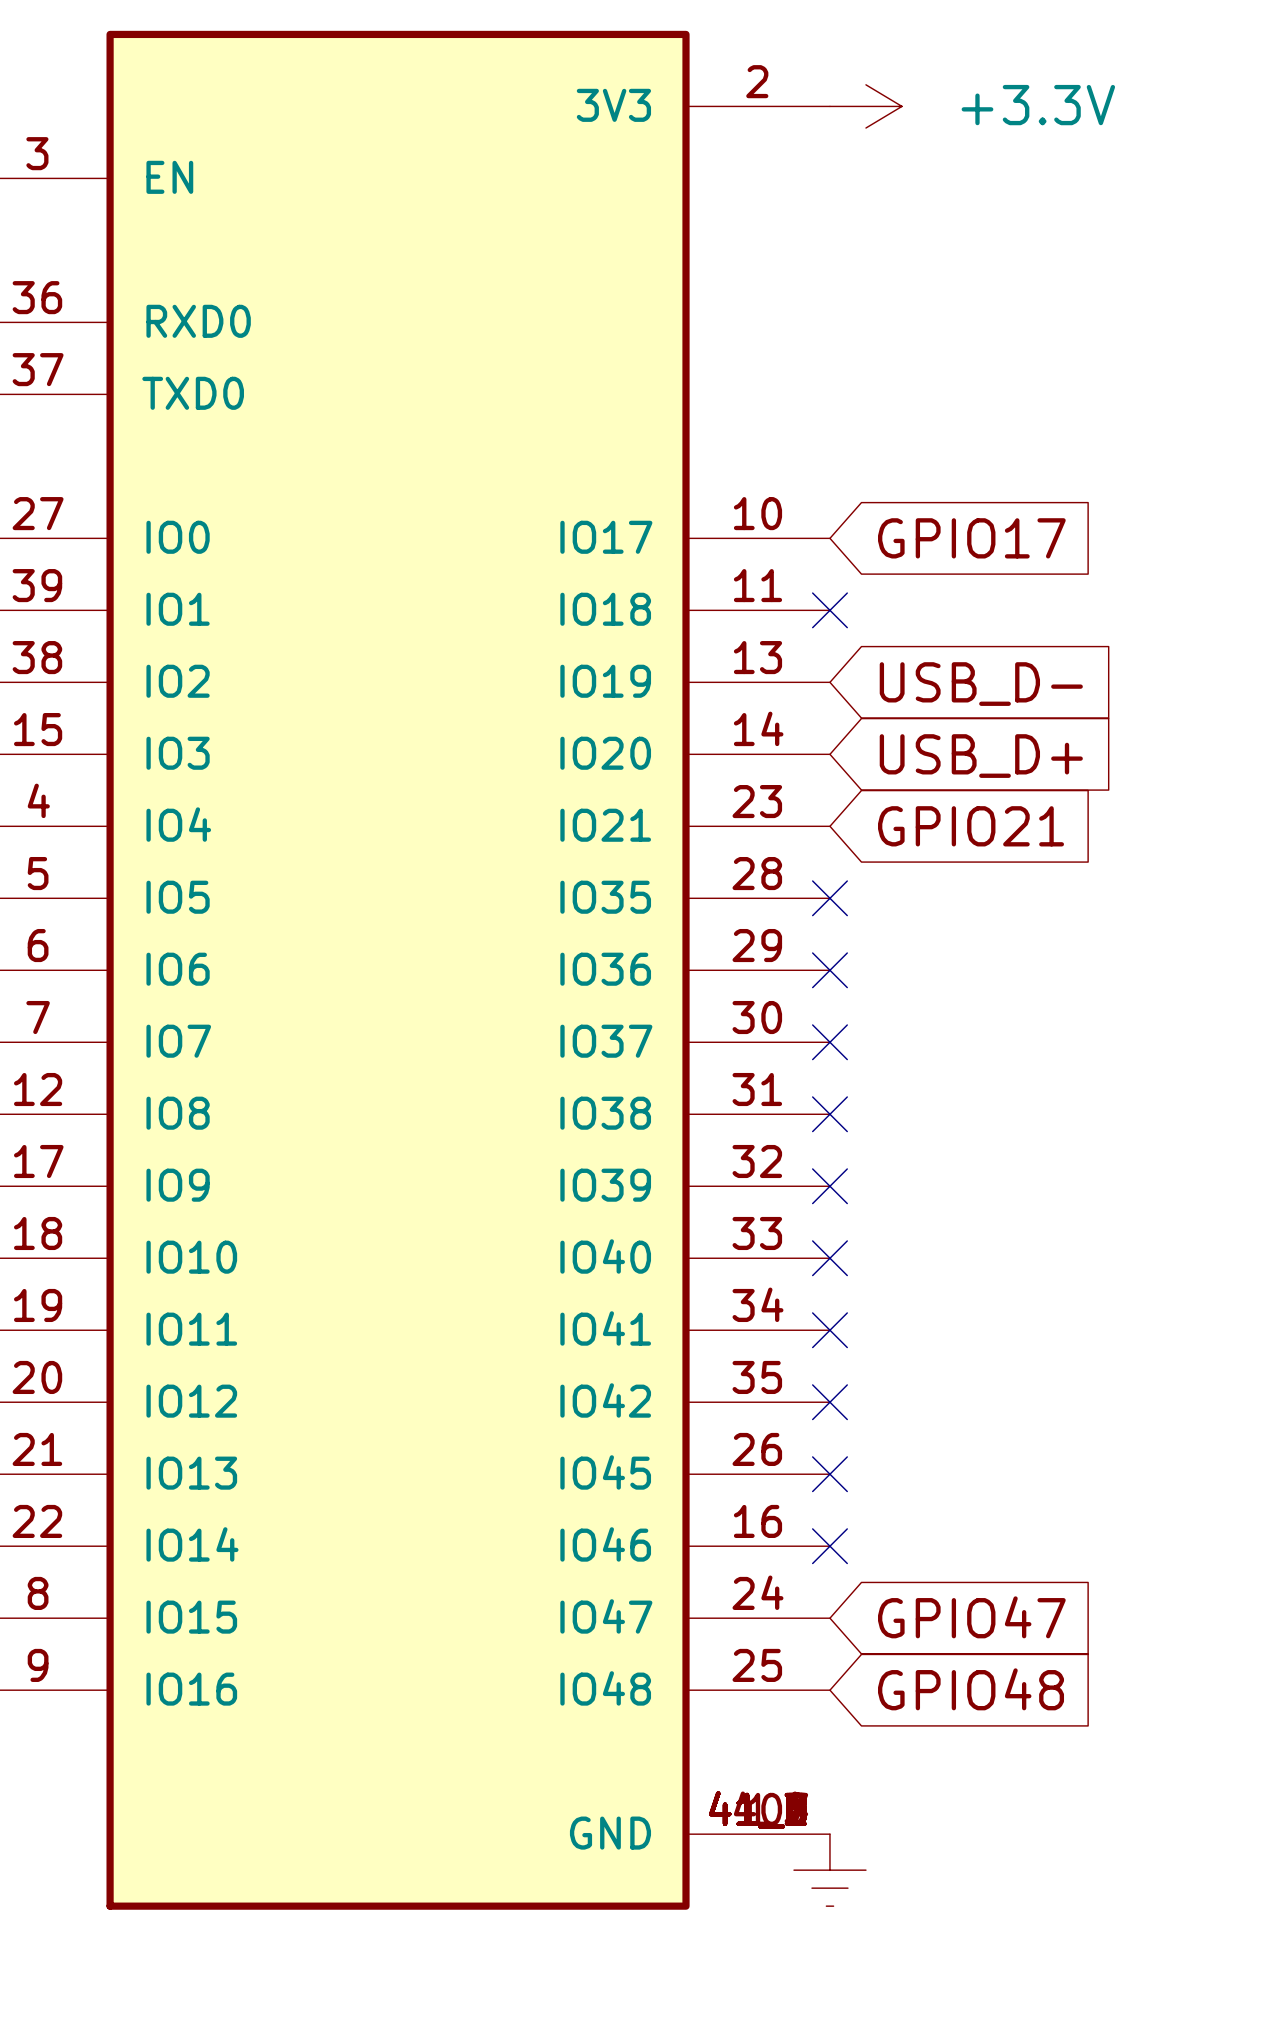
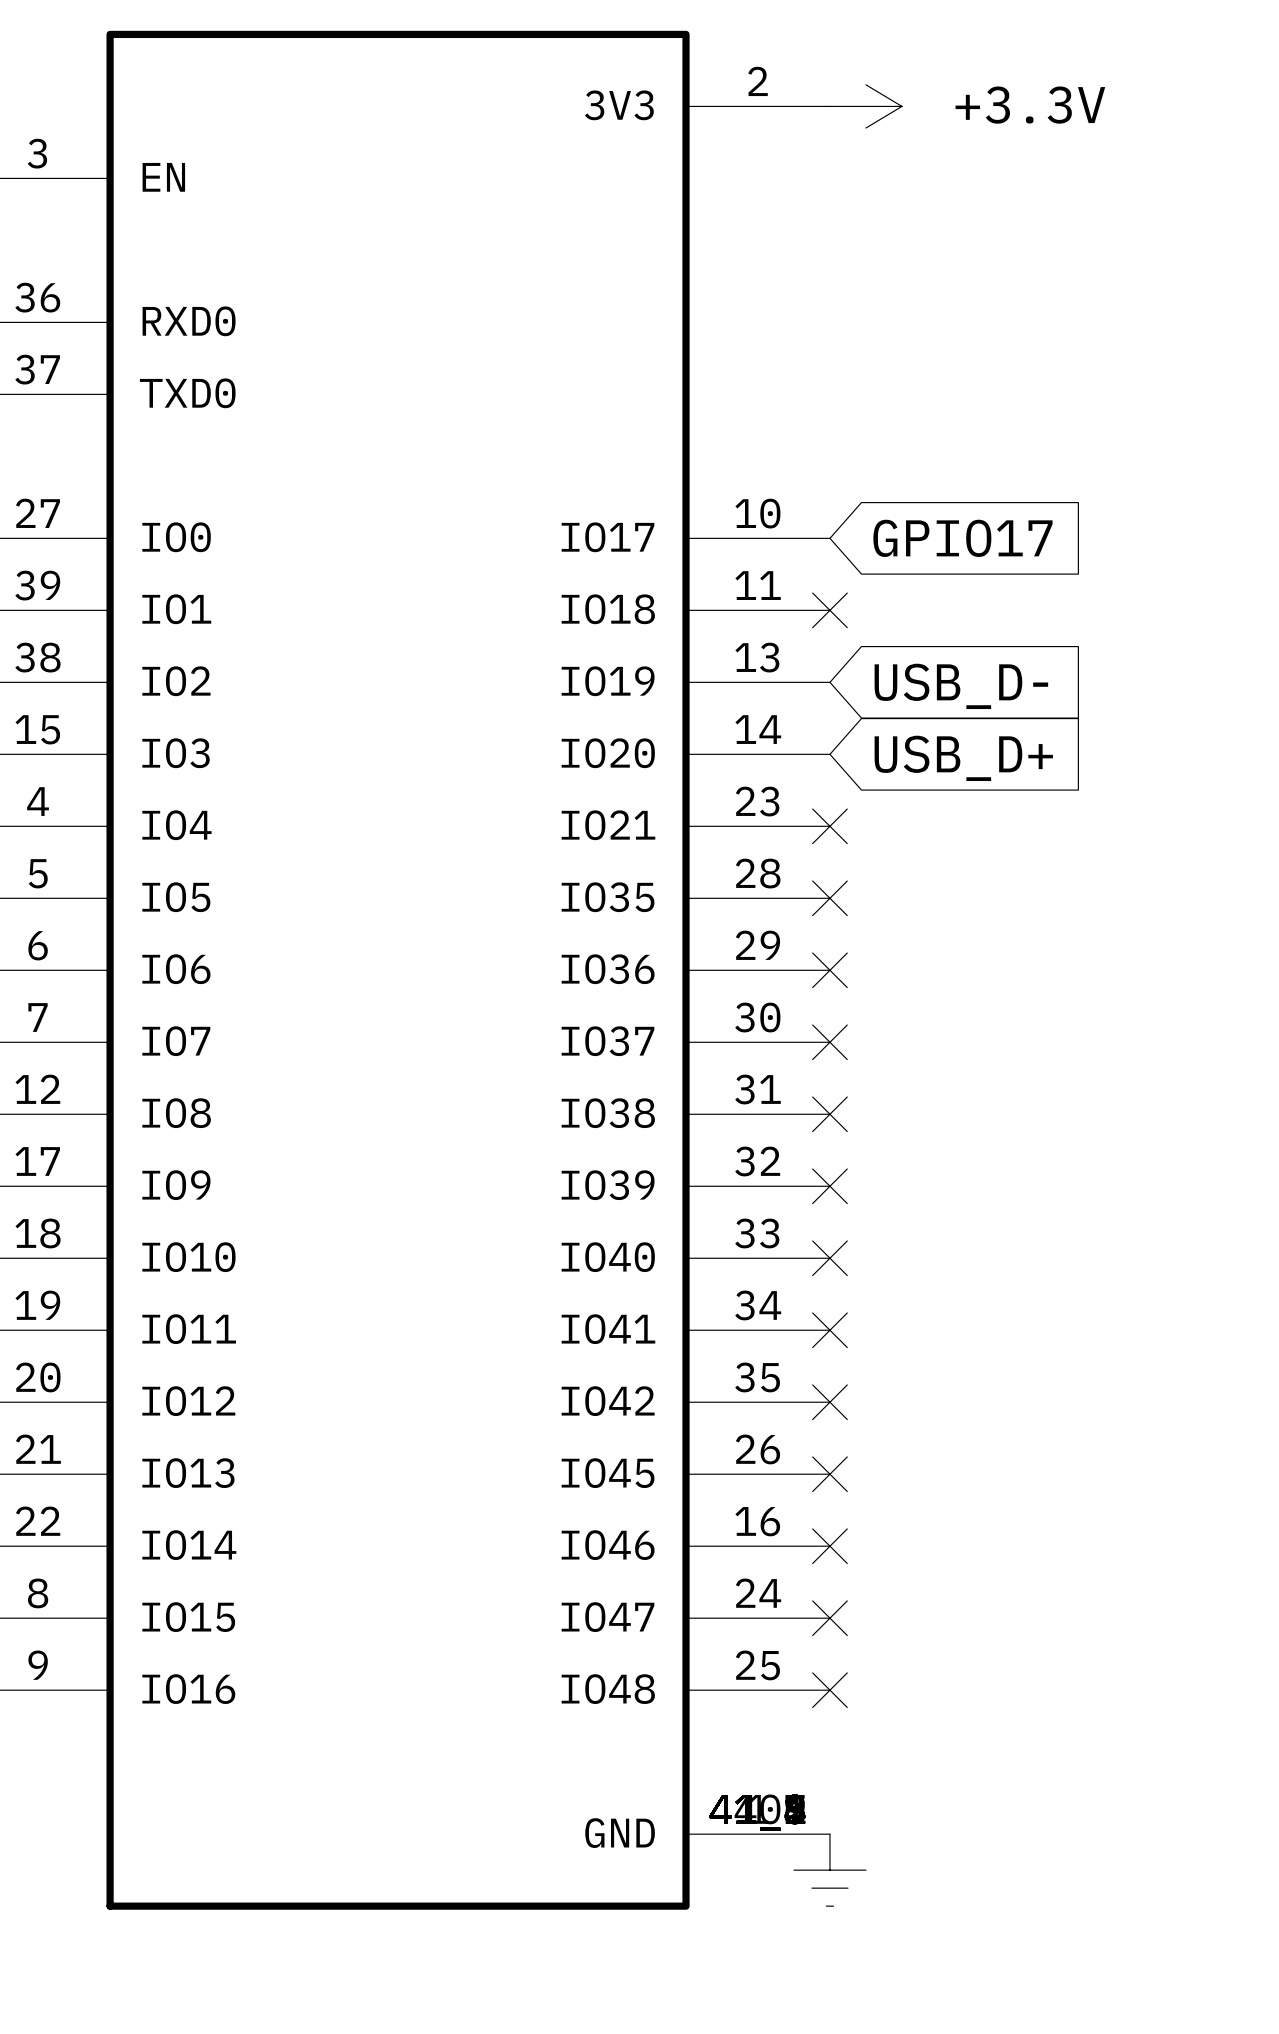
no-connect mark: none -> (829, 826)
global label: GPIO21 (971, 826) -> none
global label: GPIO47 (971, 1617) -> none
no-connect mark: none -> (829, 1618)
global label: GPIO48 (971, 1689) -> none
no-connect mark: none -> (829, 1690)

